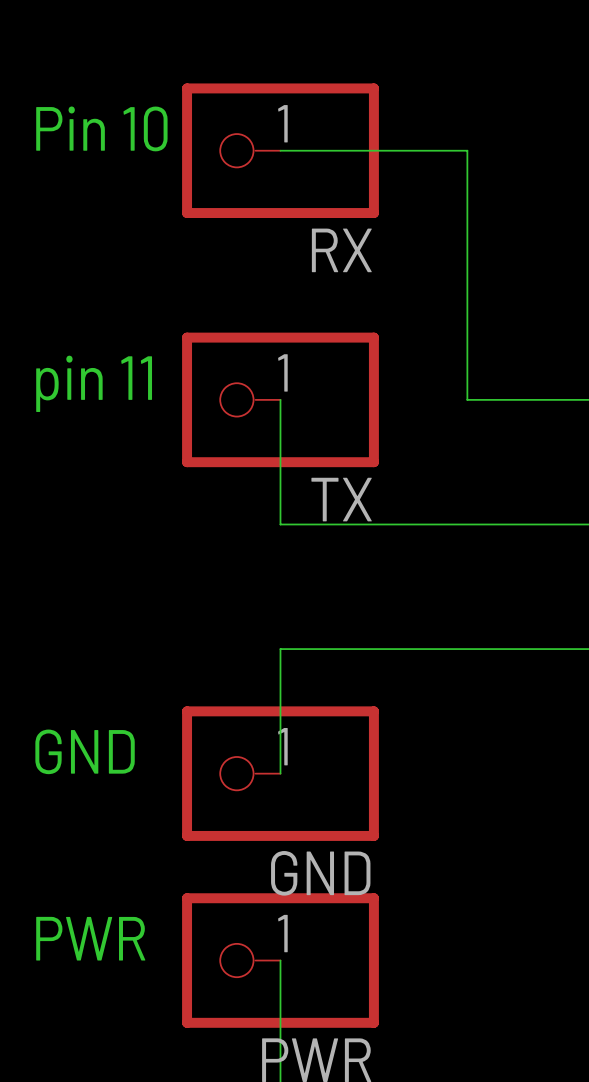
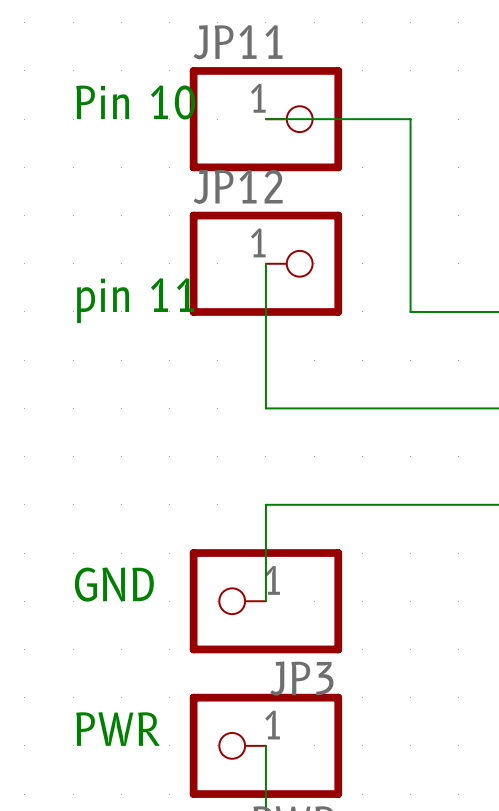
RX: (280, 150) -> none
JP11: none -> (265, 119)
wire: none -> (265, 263) (265, 311)
JP12: none -> (265, 263)
TX: (280, 399) -> none
GND name: GND (320, 873) -> JP3 (301, 678)

